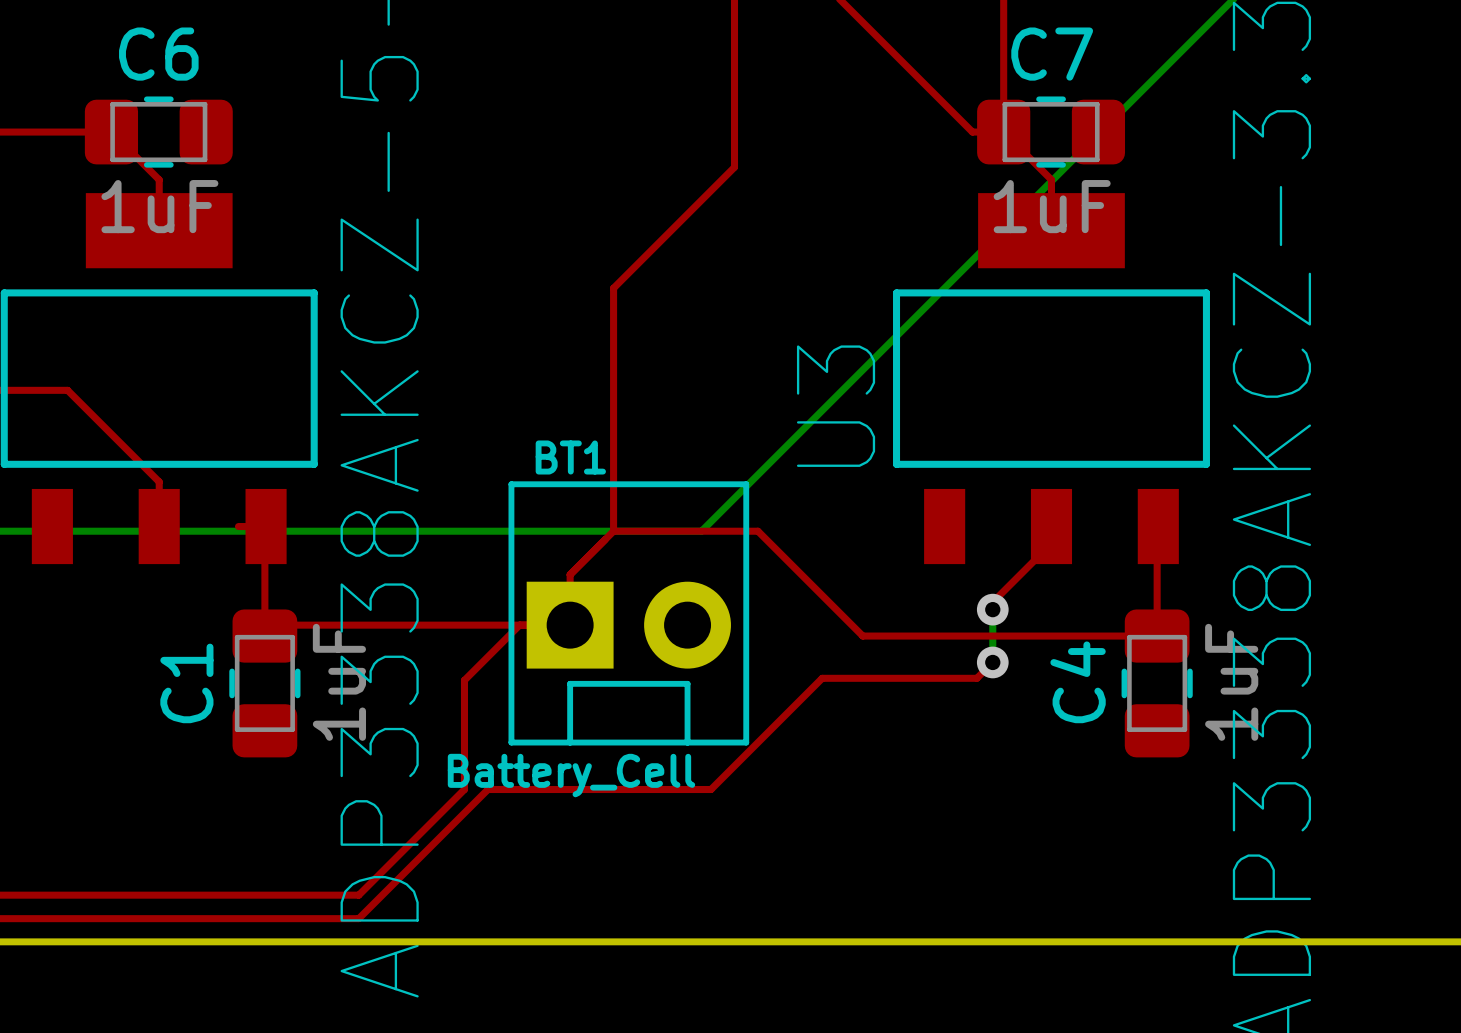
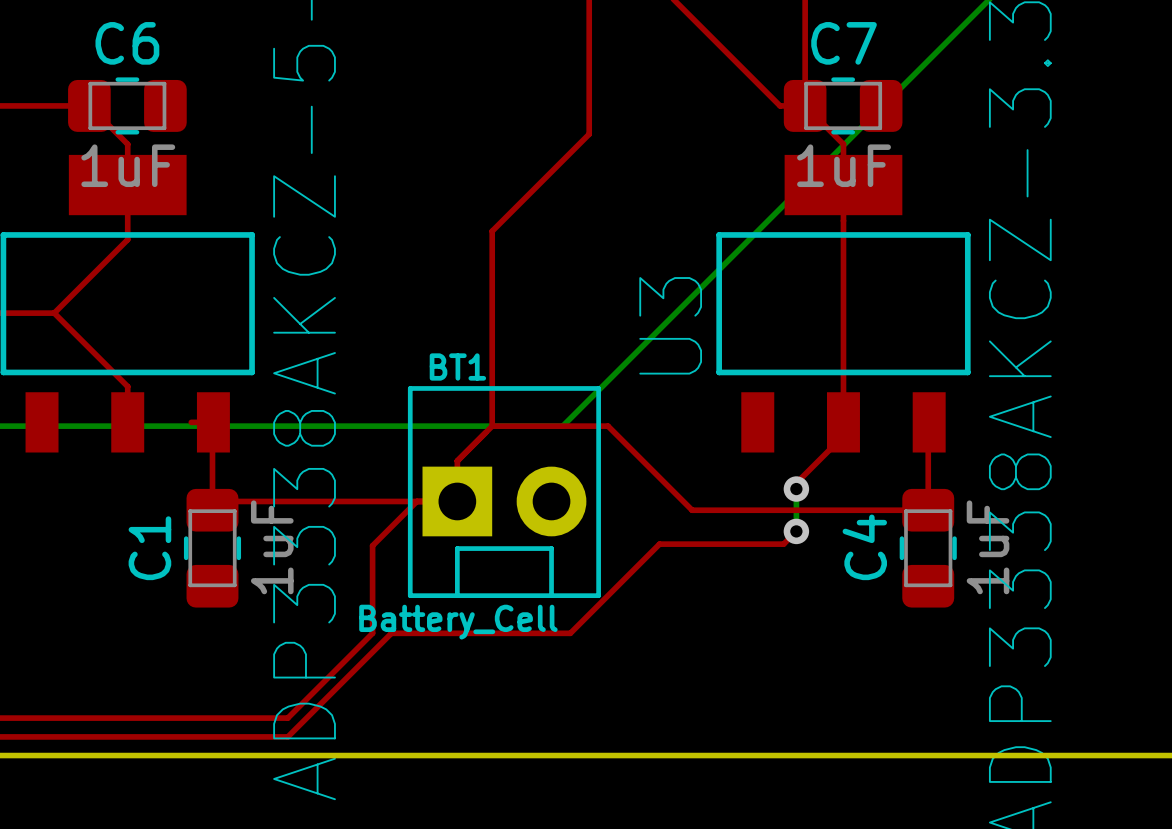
top track: none -> (127, 185) (127, 239) (54, 313)
top track: none -> (843, 185) (843, 422)

